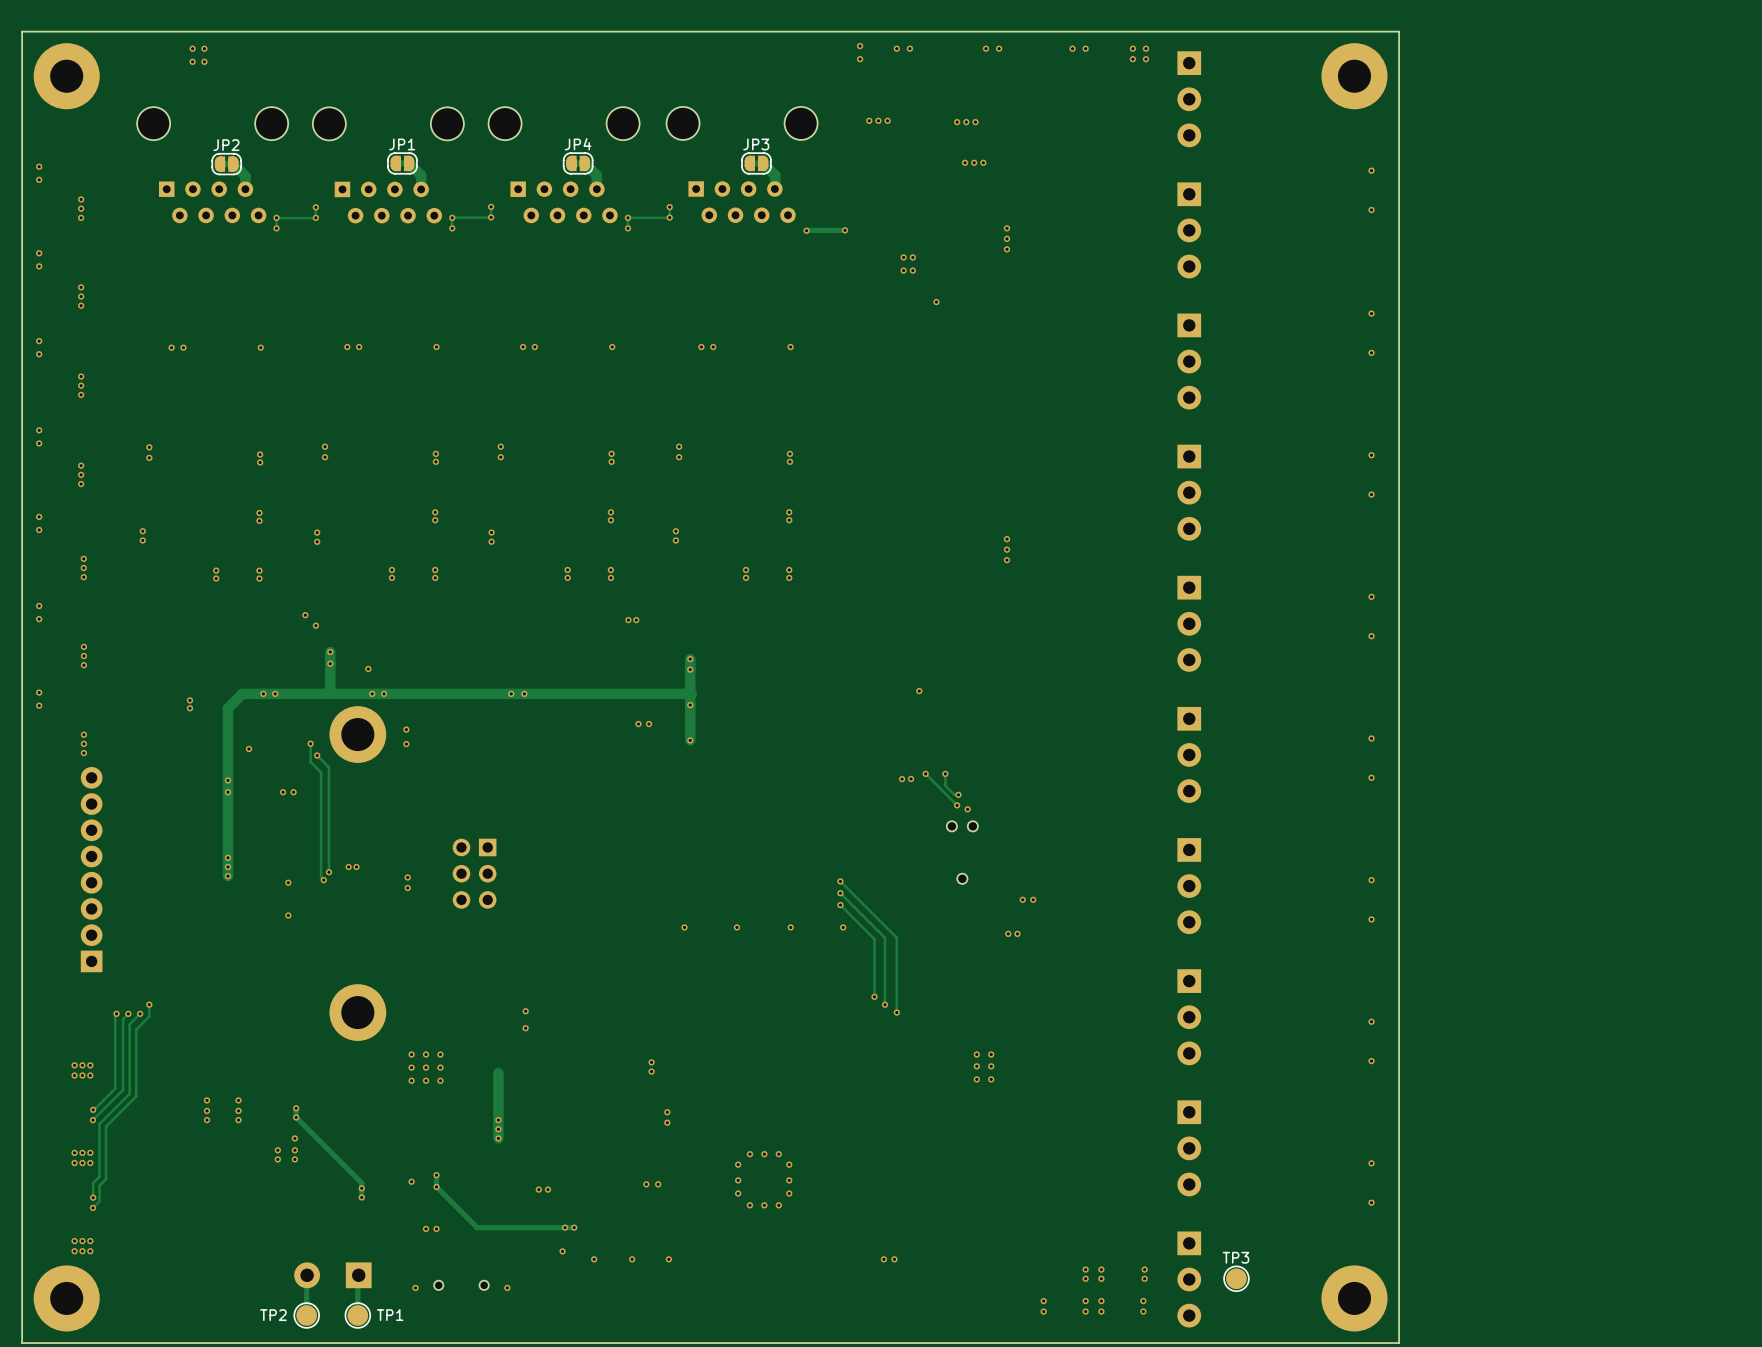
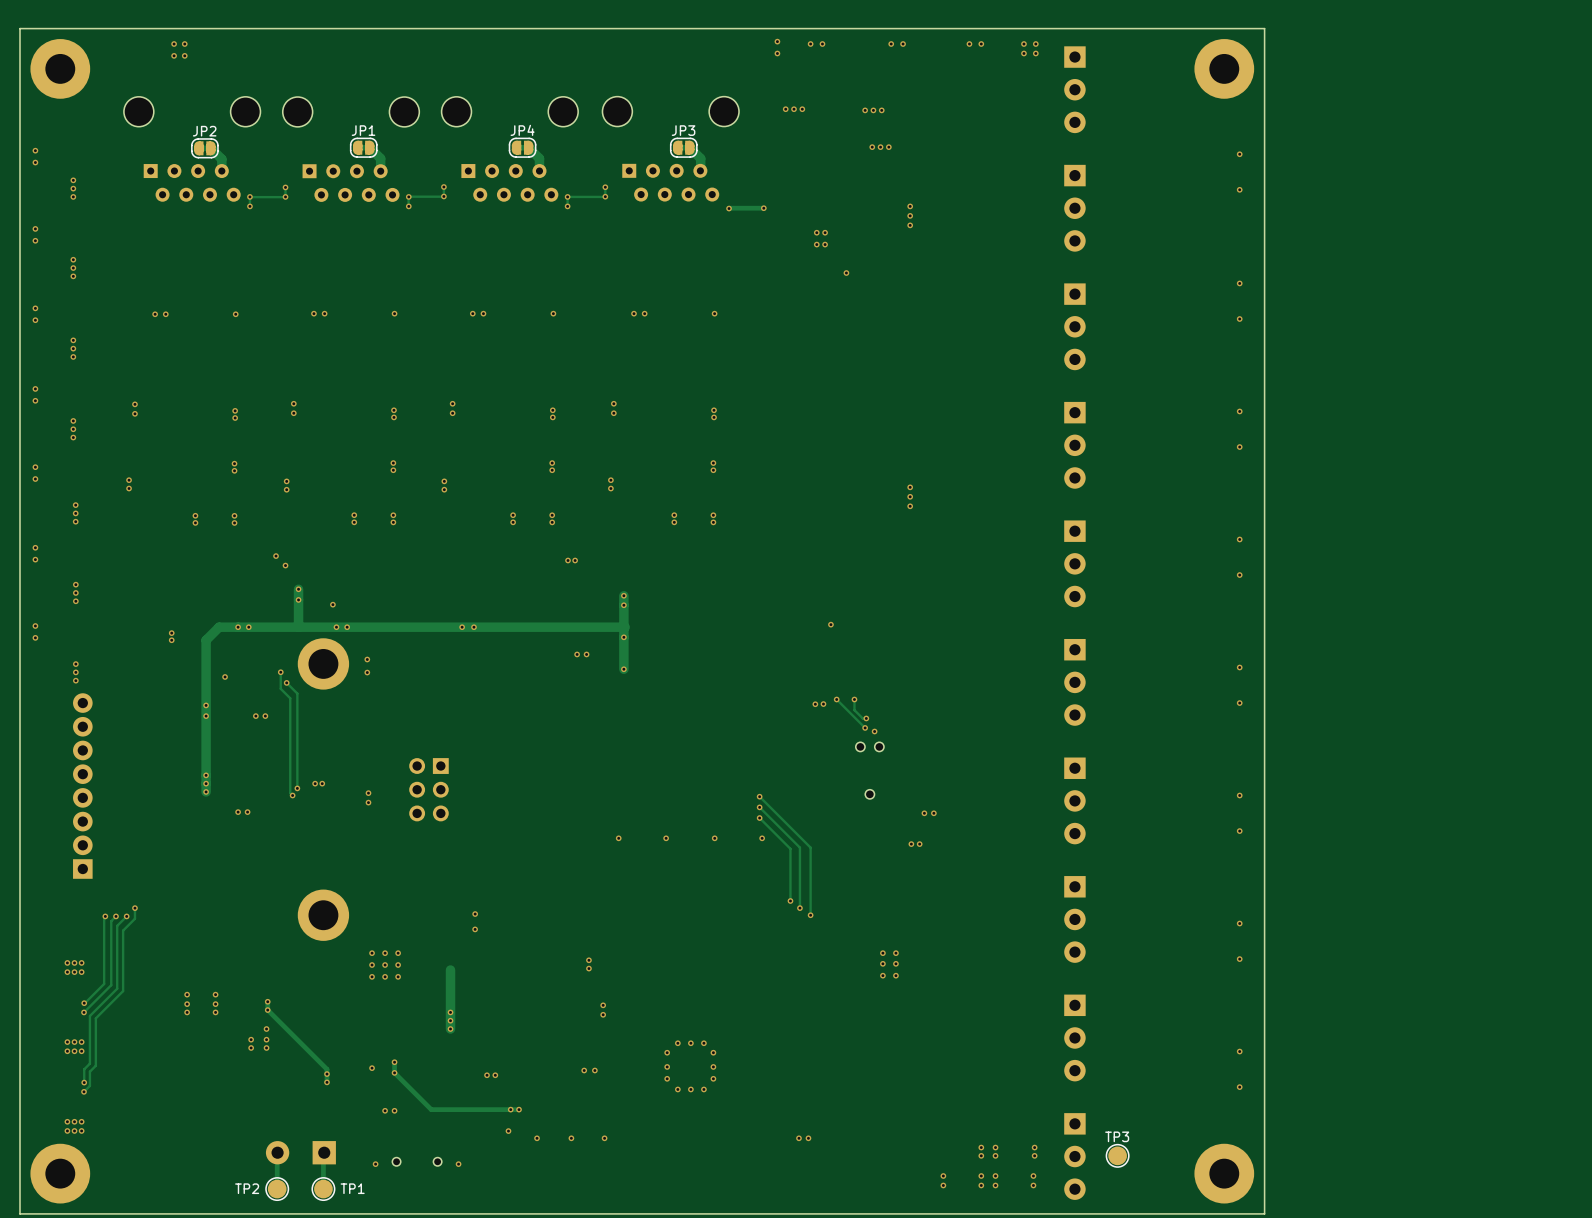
via: (288, 882) -> none
via: none -> (238, 812)
via: none -> (247, 812)
via: (288, 915) -> none

